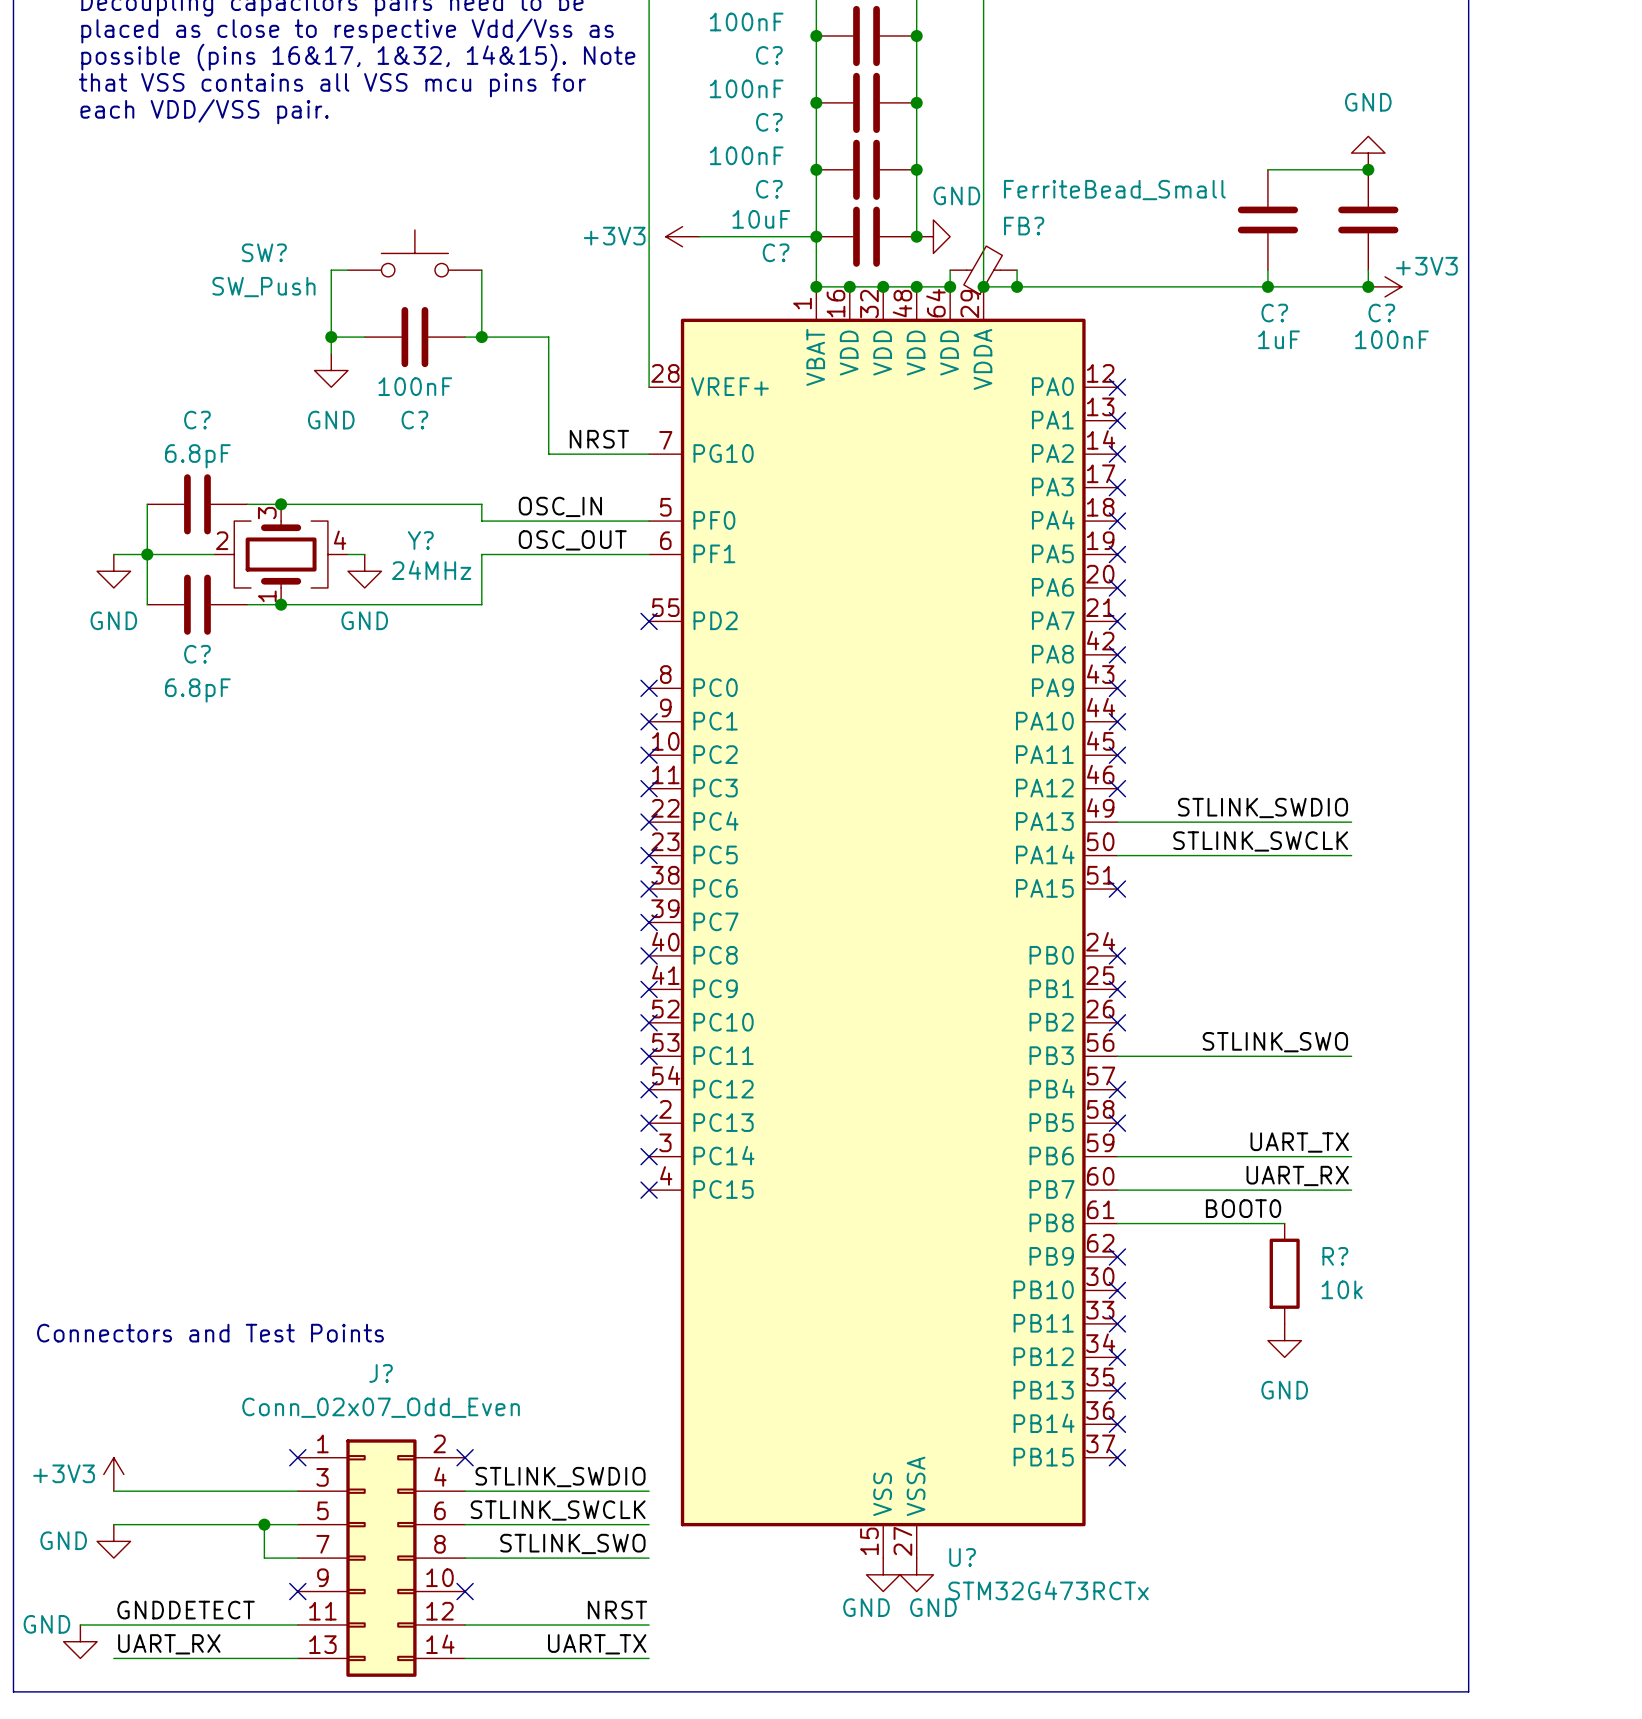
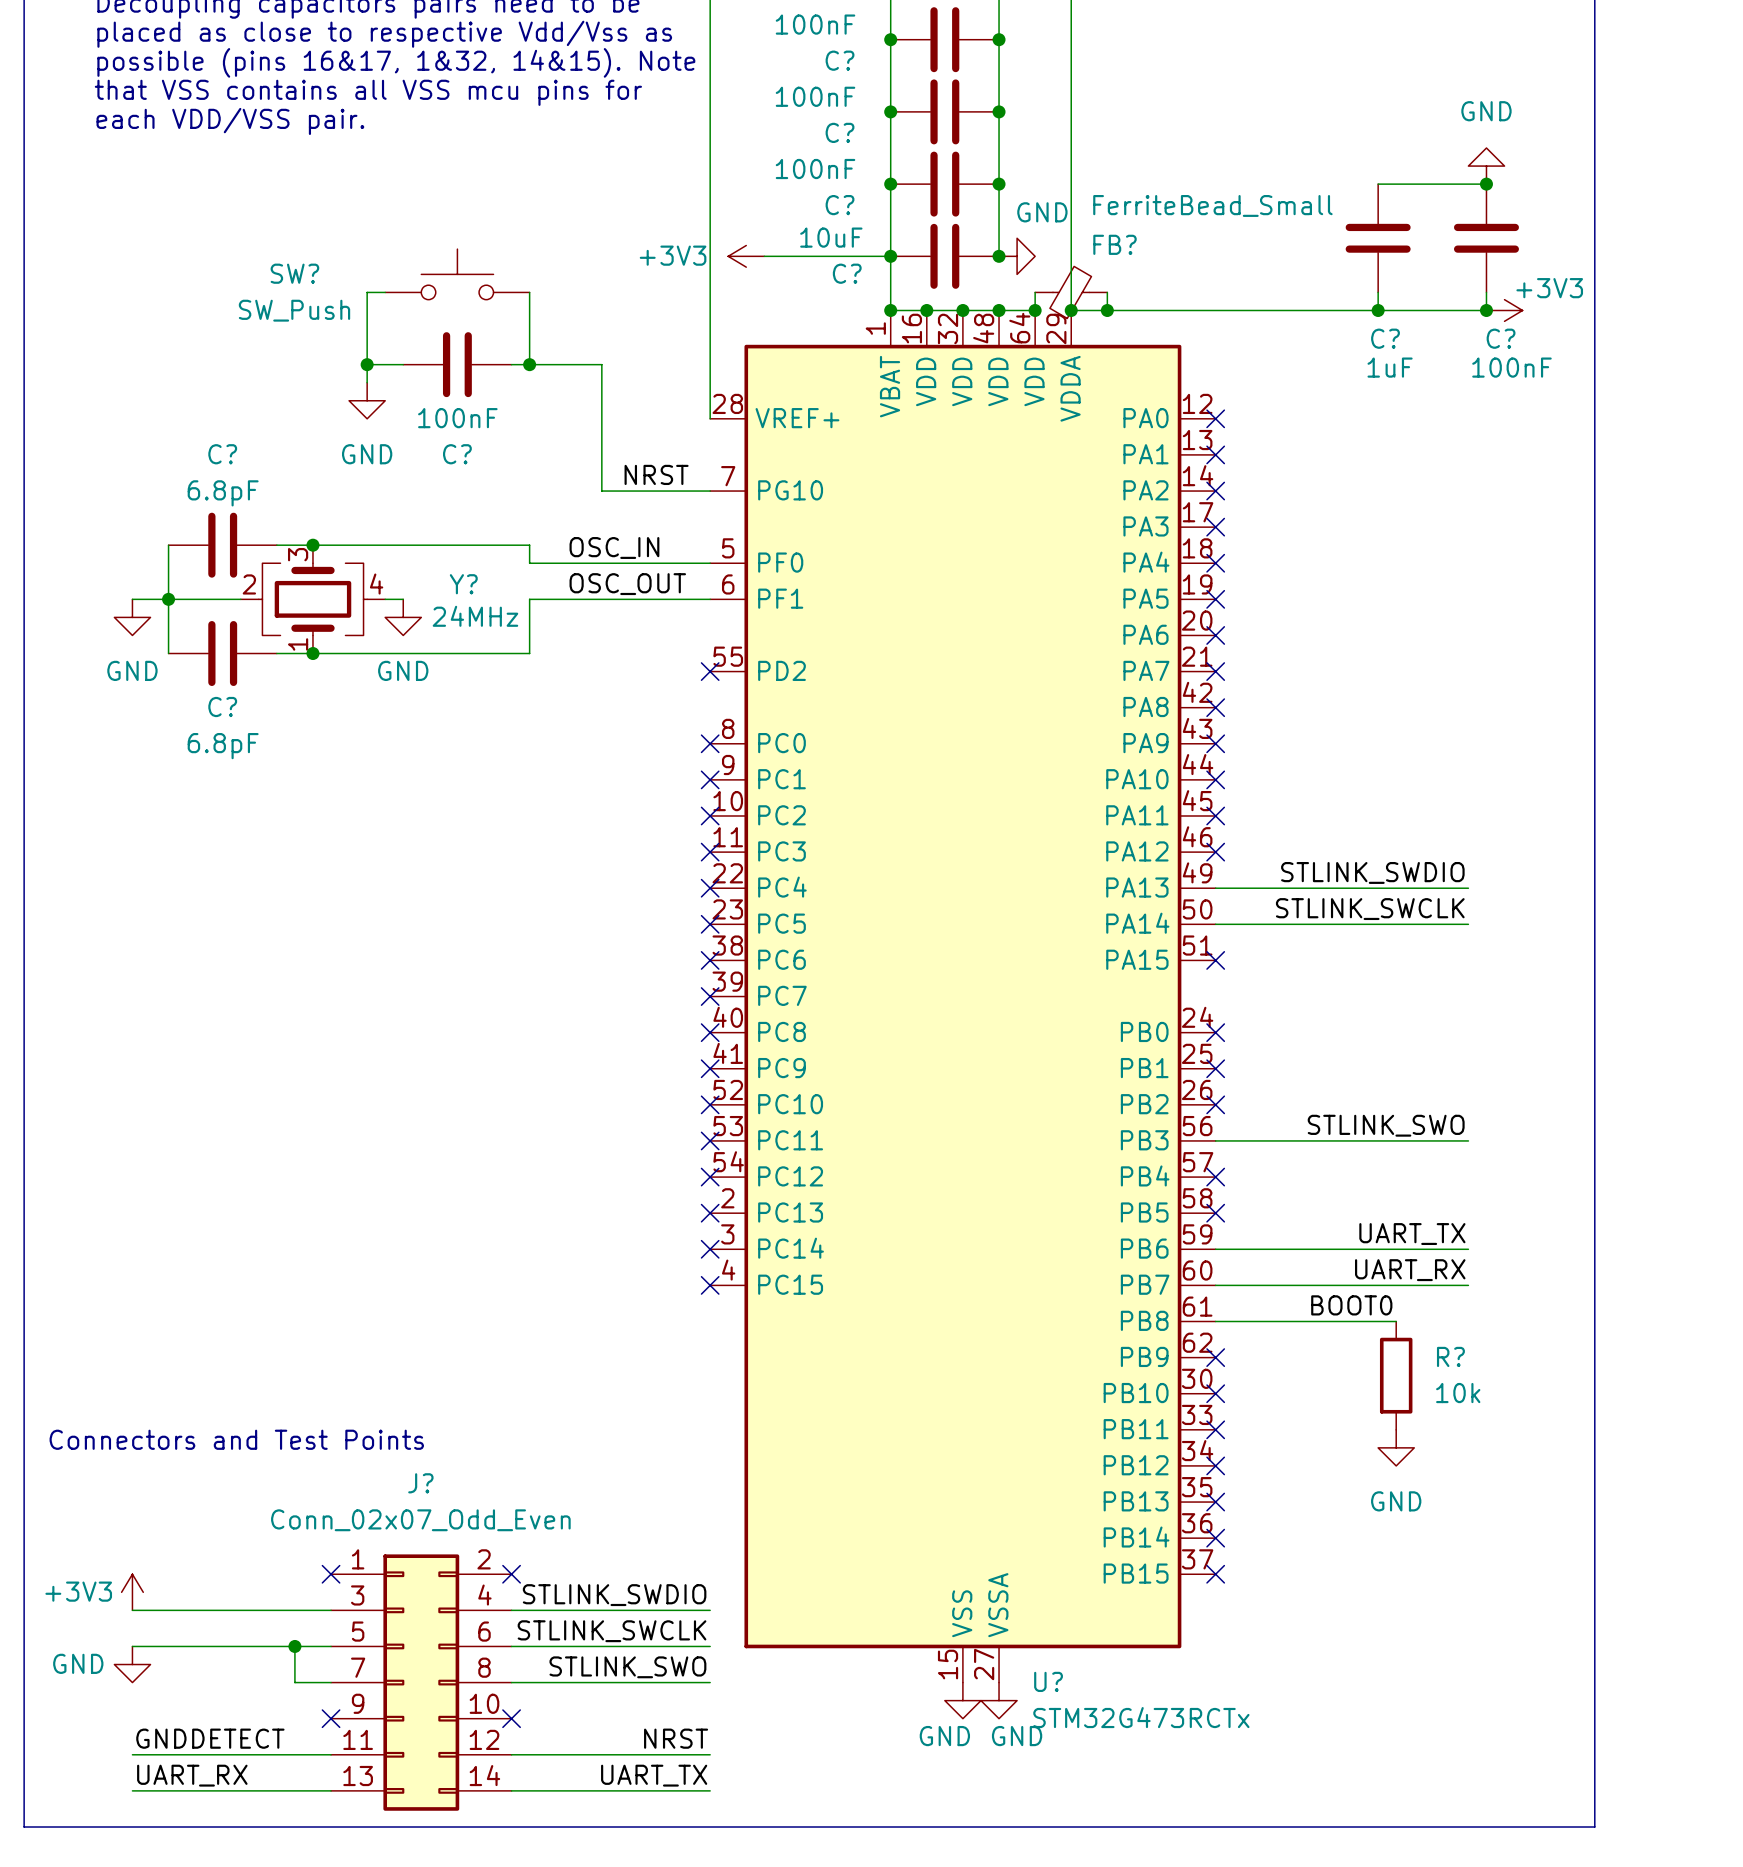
wire: (80, 1624) (113, 1624) -> none
power symbol: GND (80, 1641) -> none

